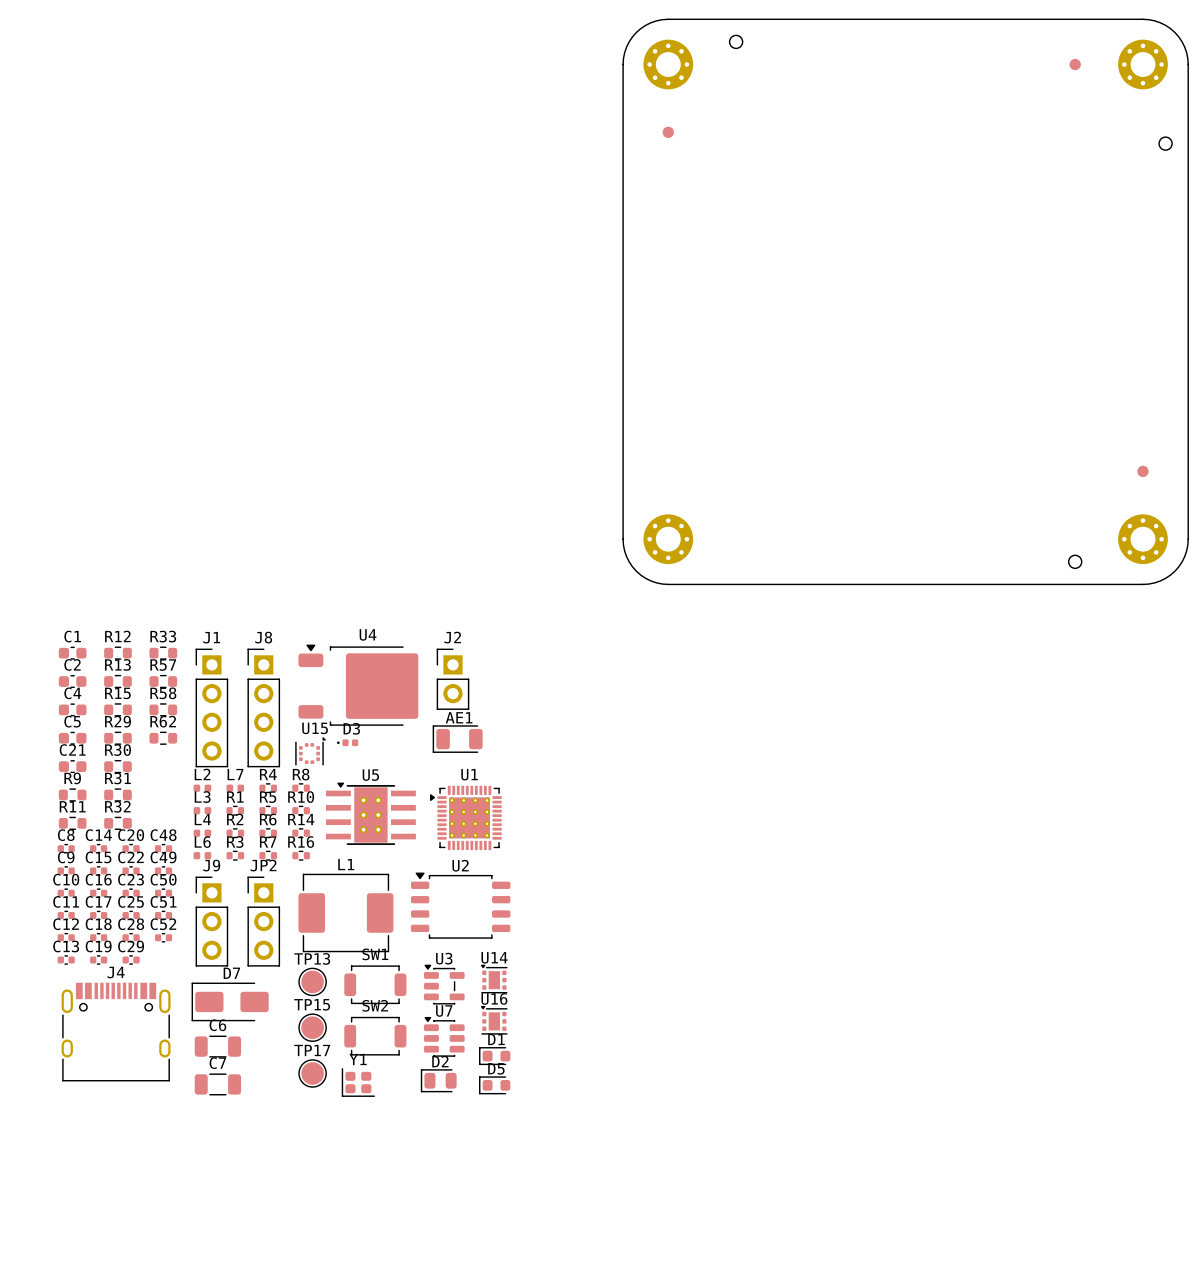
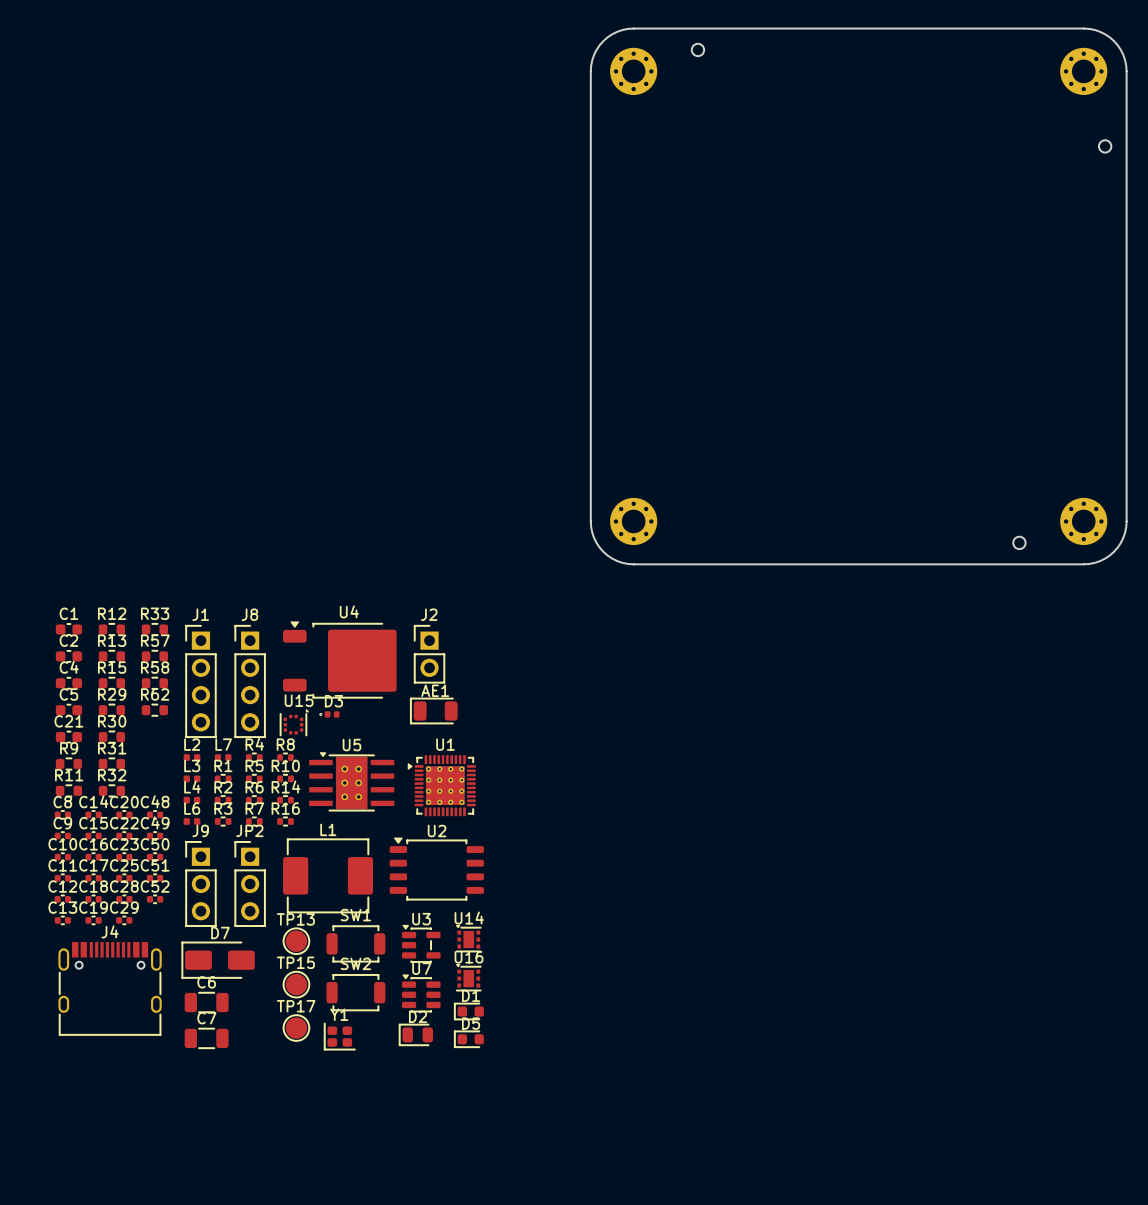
part: (1075, 64) -> none
part: (668, 132) -> none
part: (1143, 471) -> none

